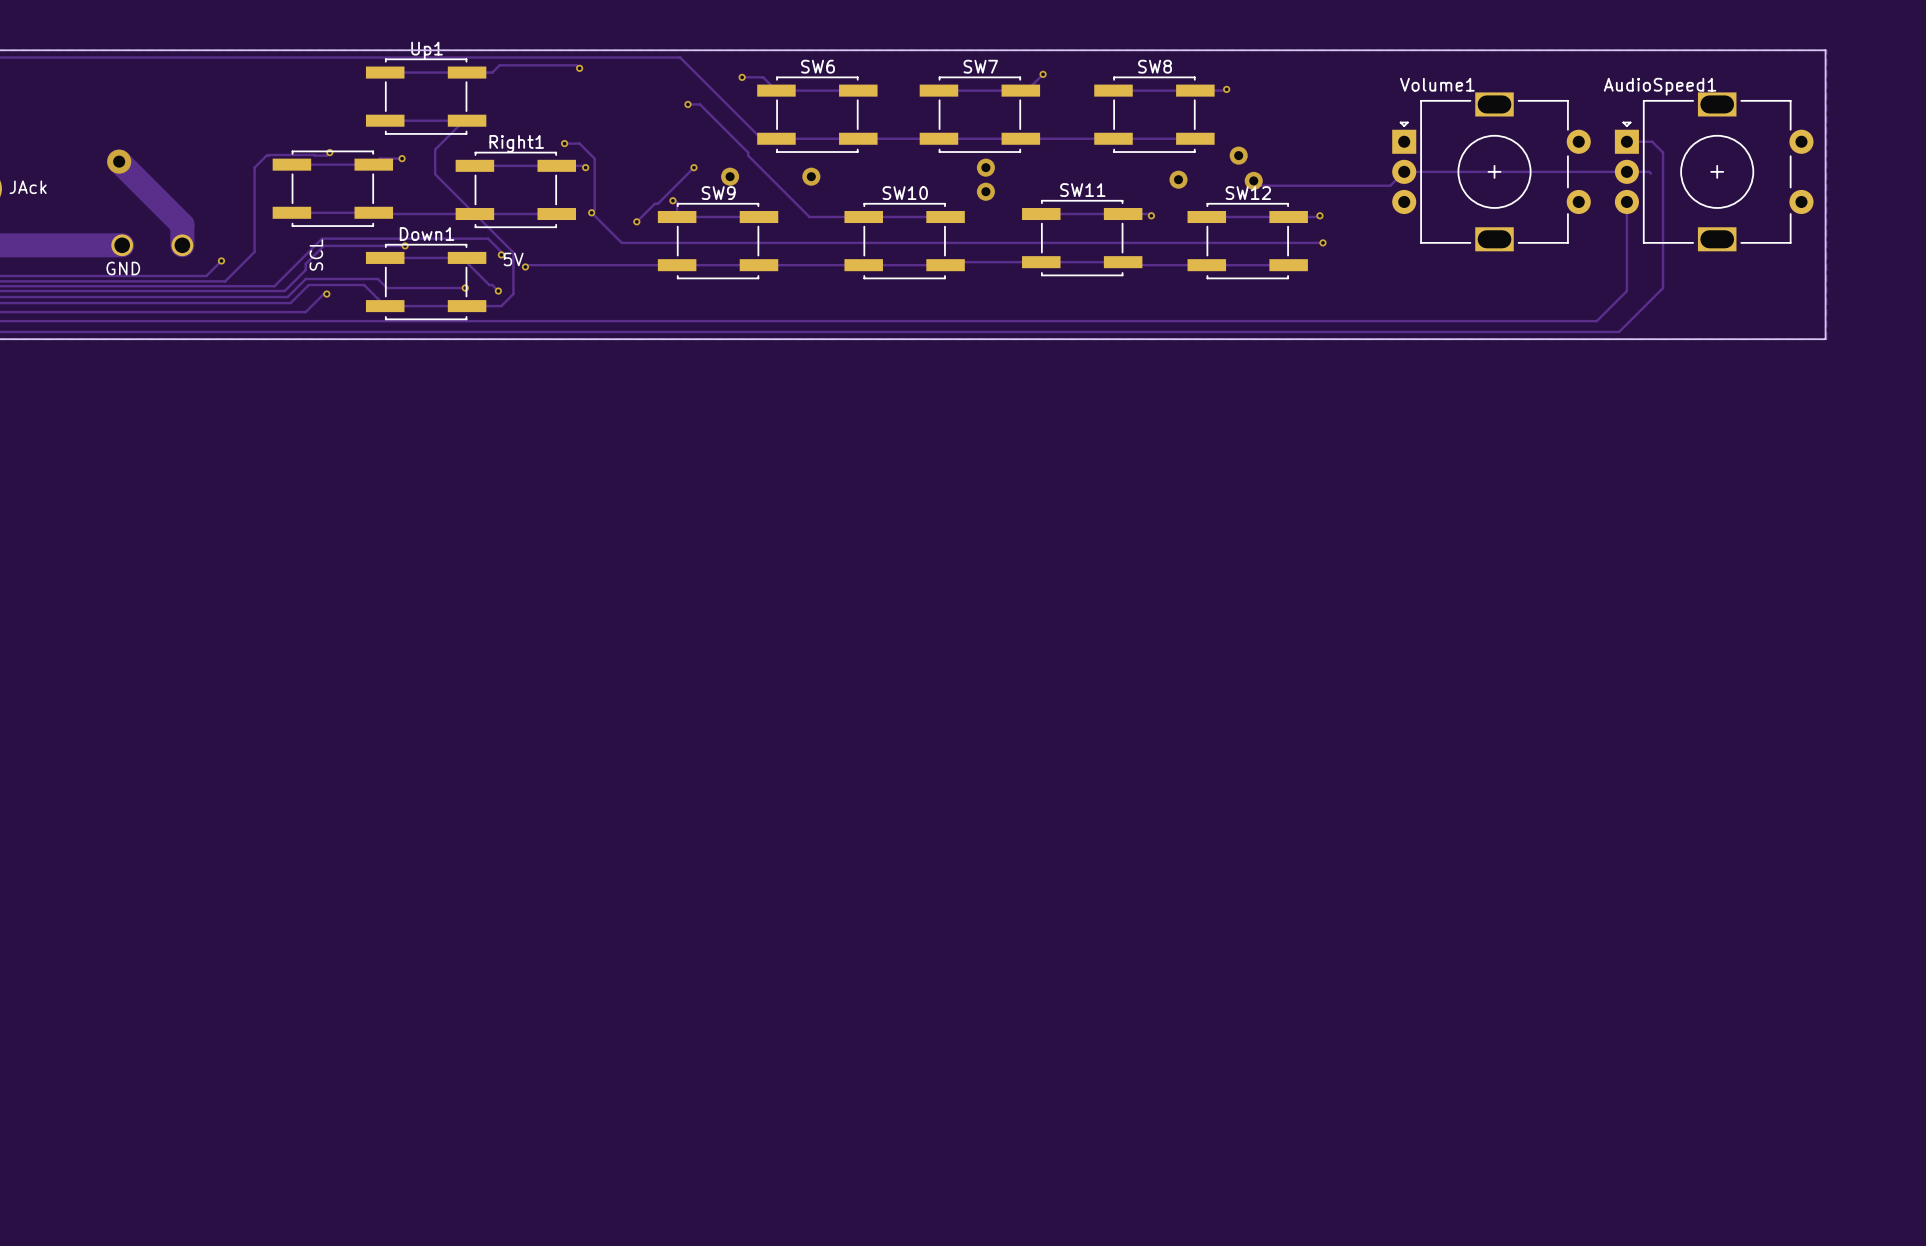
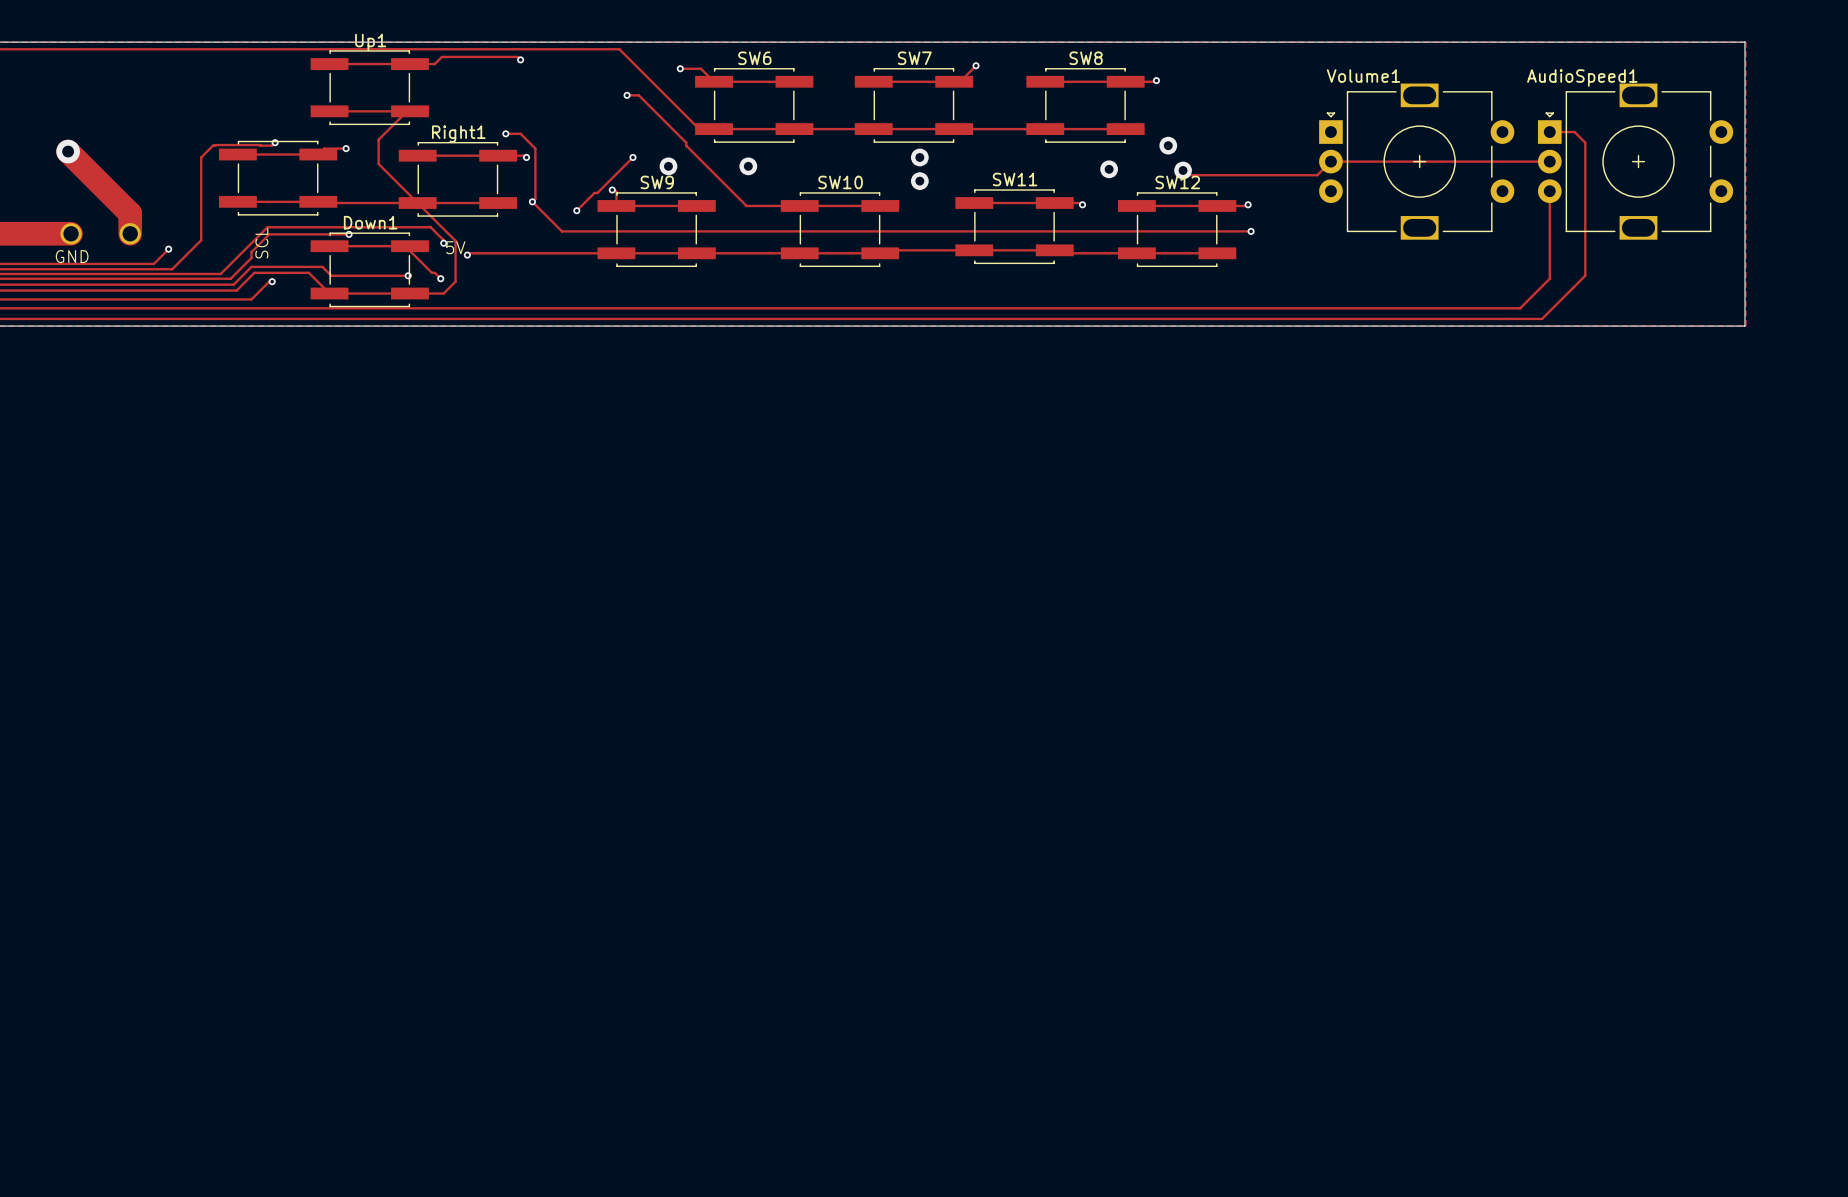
track: (1626, 171) (1649, 171) (1651, 173) -> none

